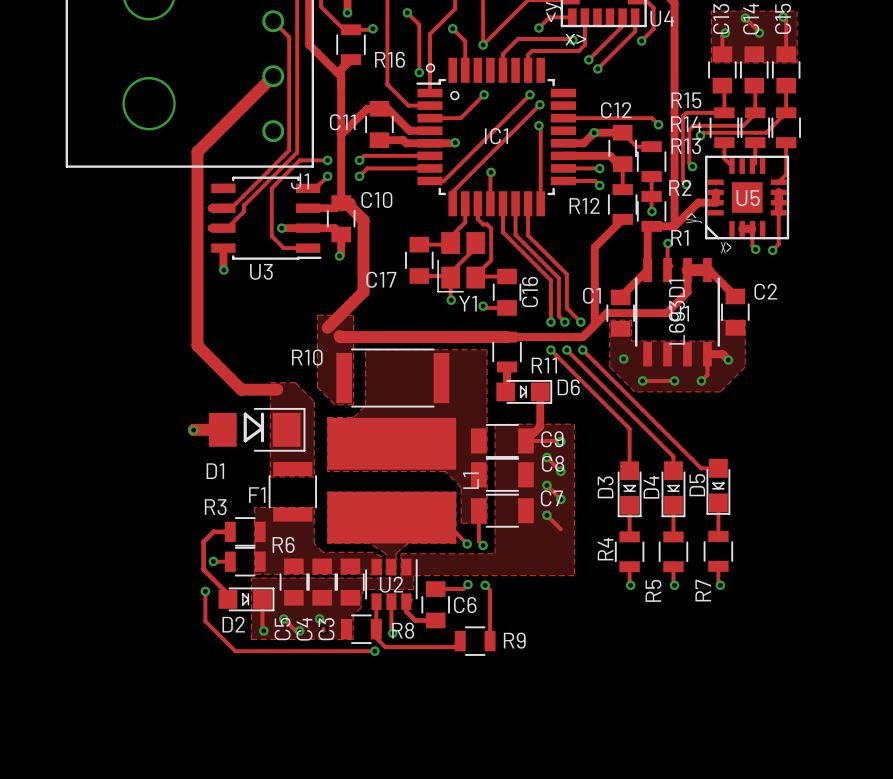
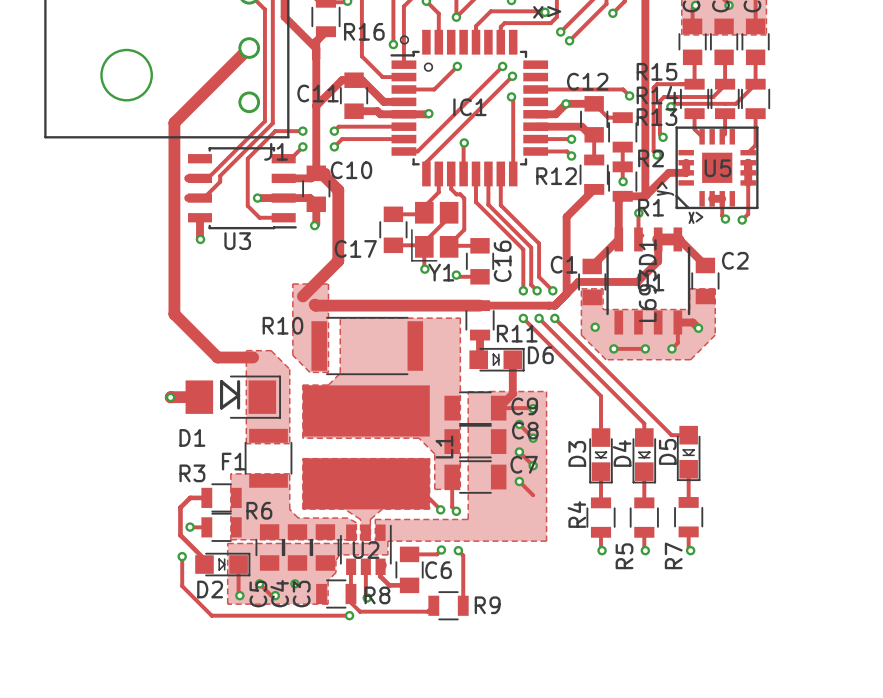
track: (323, 628) (323, 630) -> none

